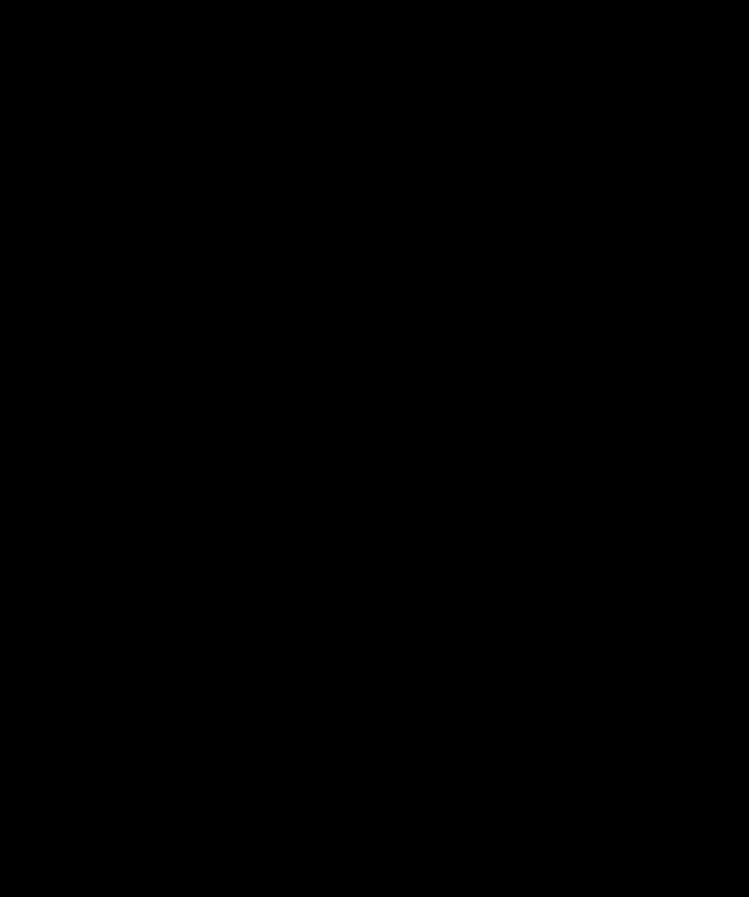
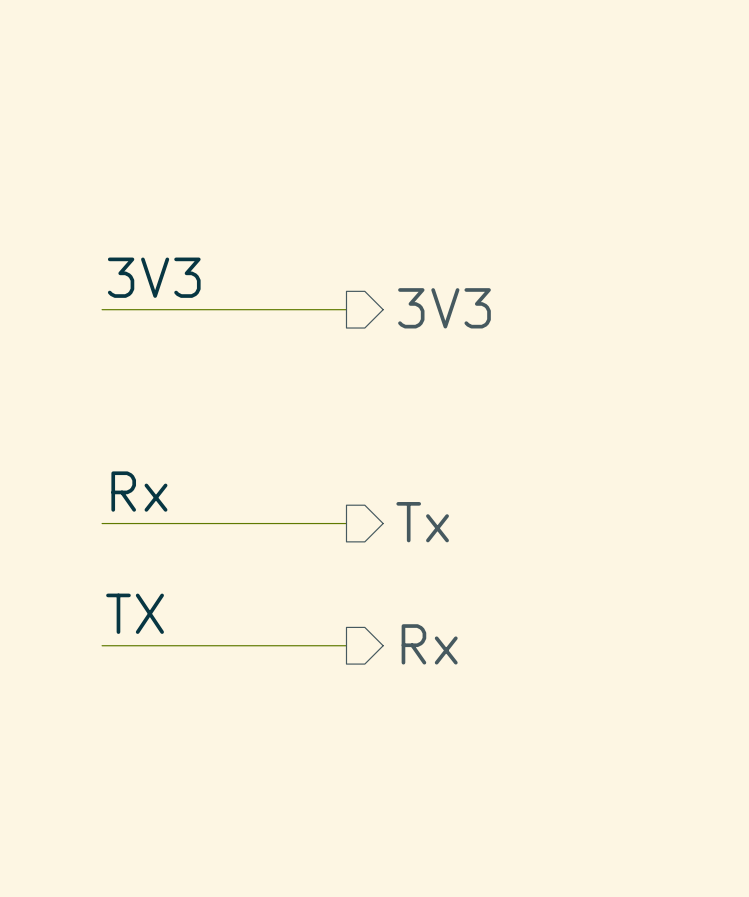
label: none -> 3V3 (154, 277)
sheet pin: none -> 3V3 (444, 308)
wire: none -> (102, 309) (346, 309)
label: none -> Rx (139, 491)
sheet pin: none -> Tx (422, 522)
wire: none -> (102, 523) (346, 523)
label: none -> TX (135, 613)
sheet pin: none -> Rx (429, 644)
wire: none -> (102, 645) (346, 645)

